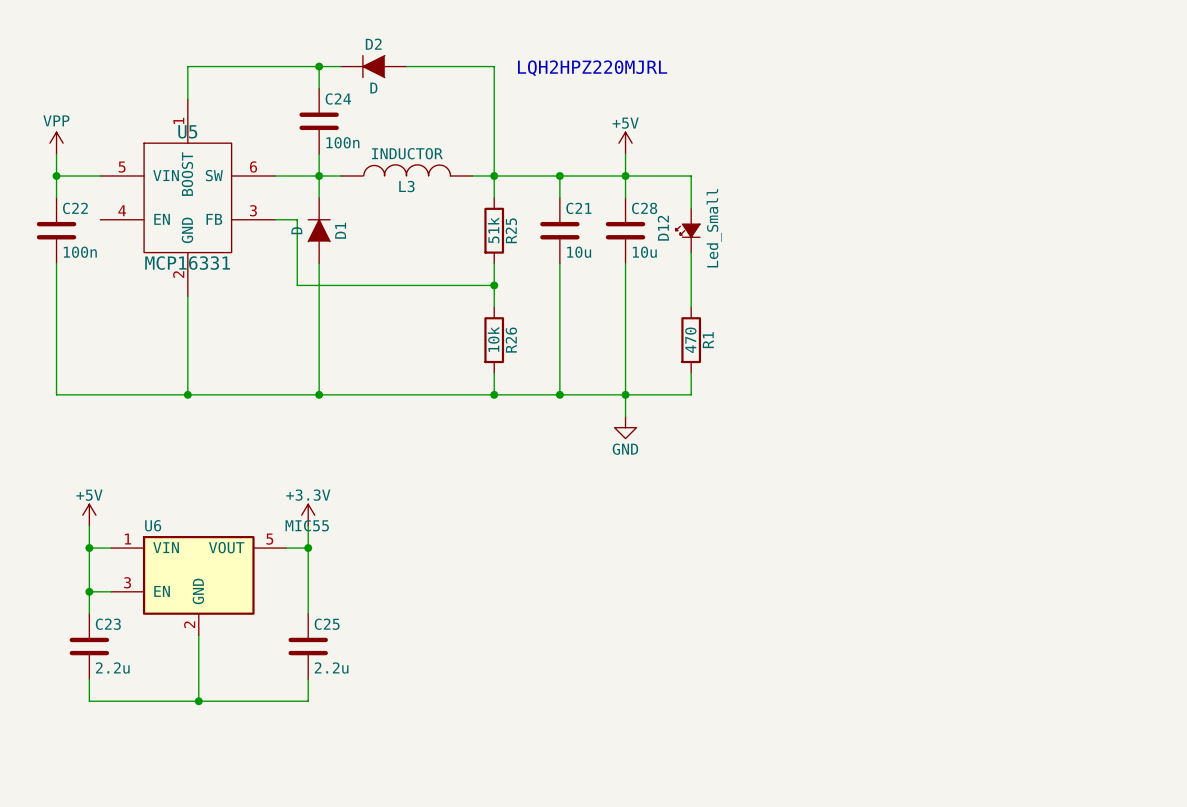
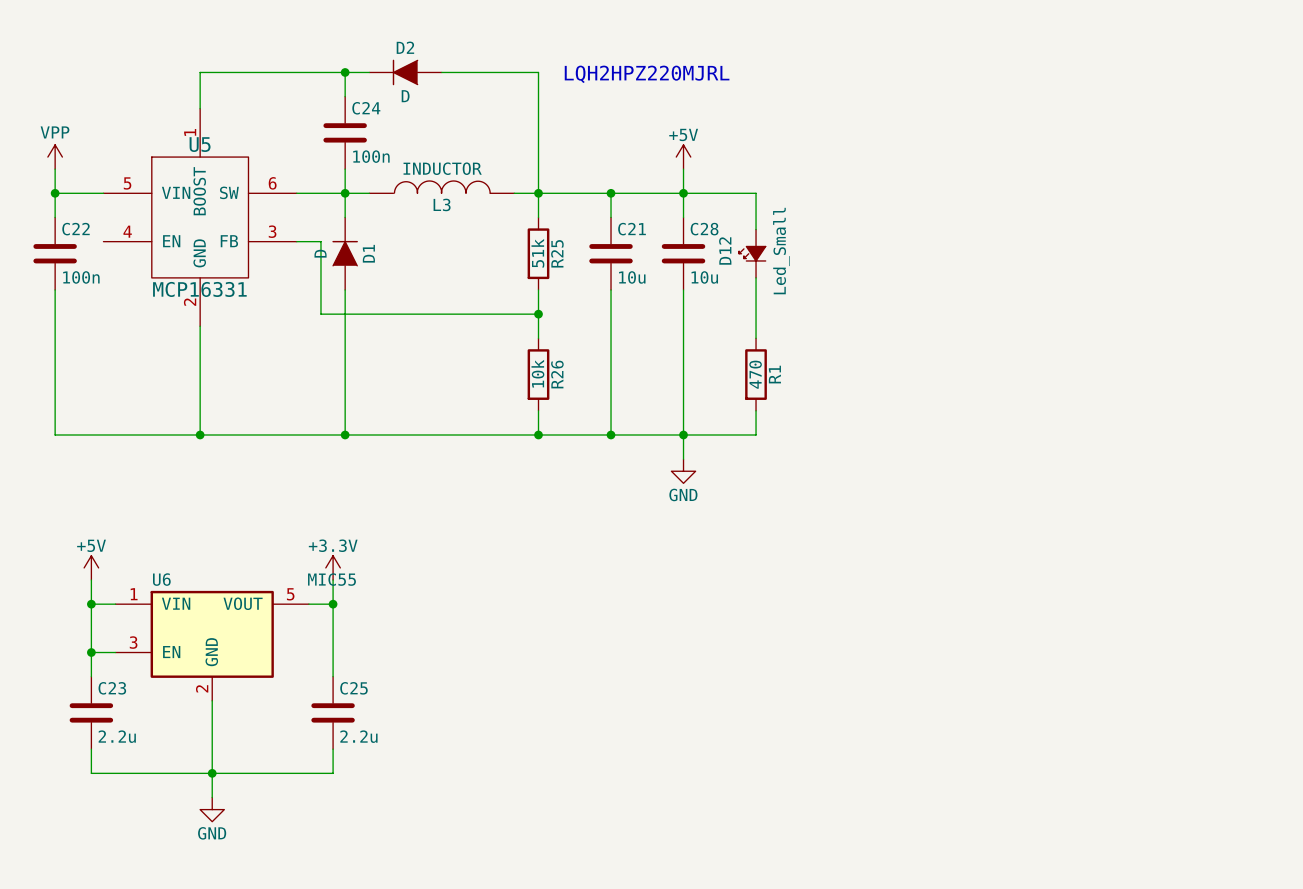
wire: none -> (212, 773) (212, 797)
power symbol: none -> GND (212, 809)

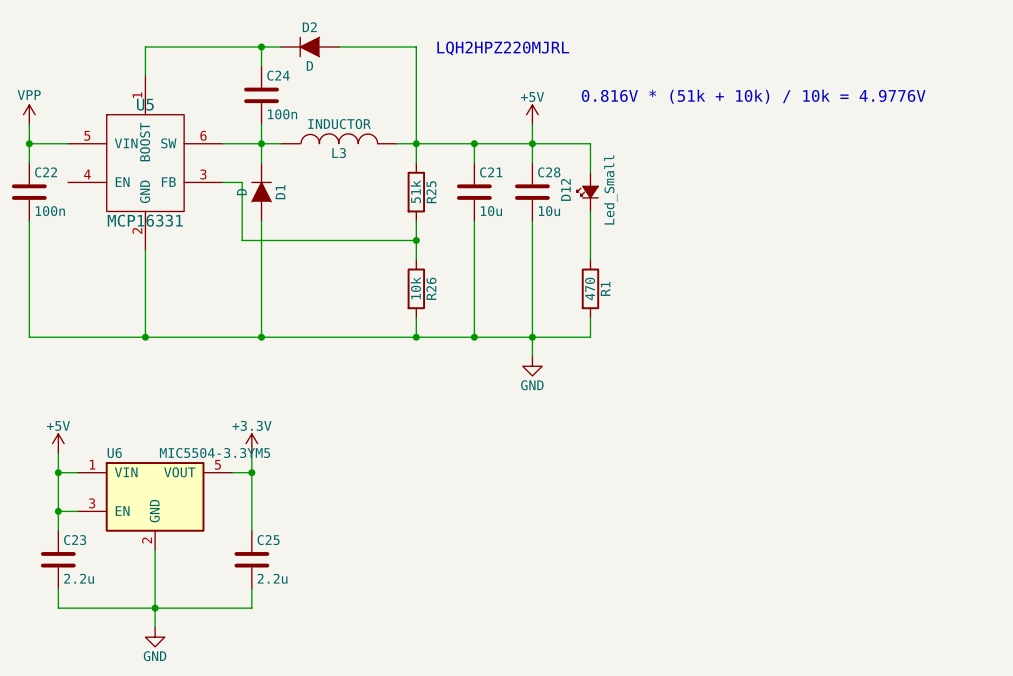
text: none -> 0.816V * (51k + 10k) / 10k = 4.9776V (753, 96)
U6 value: MIC55 (331, 579) -> MIC5504-3.3YM5 (215, 452)

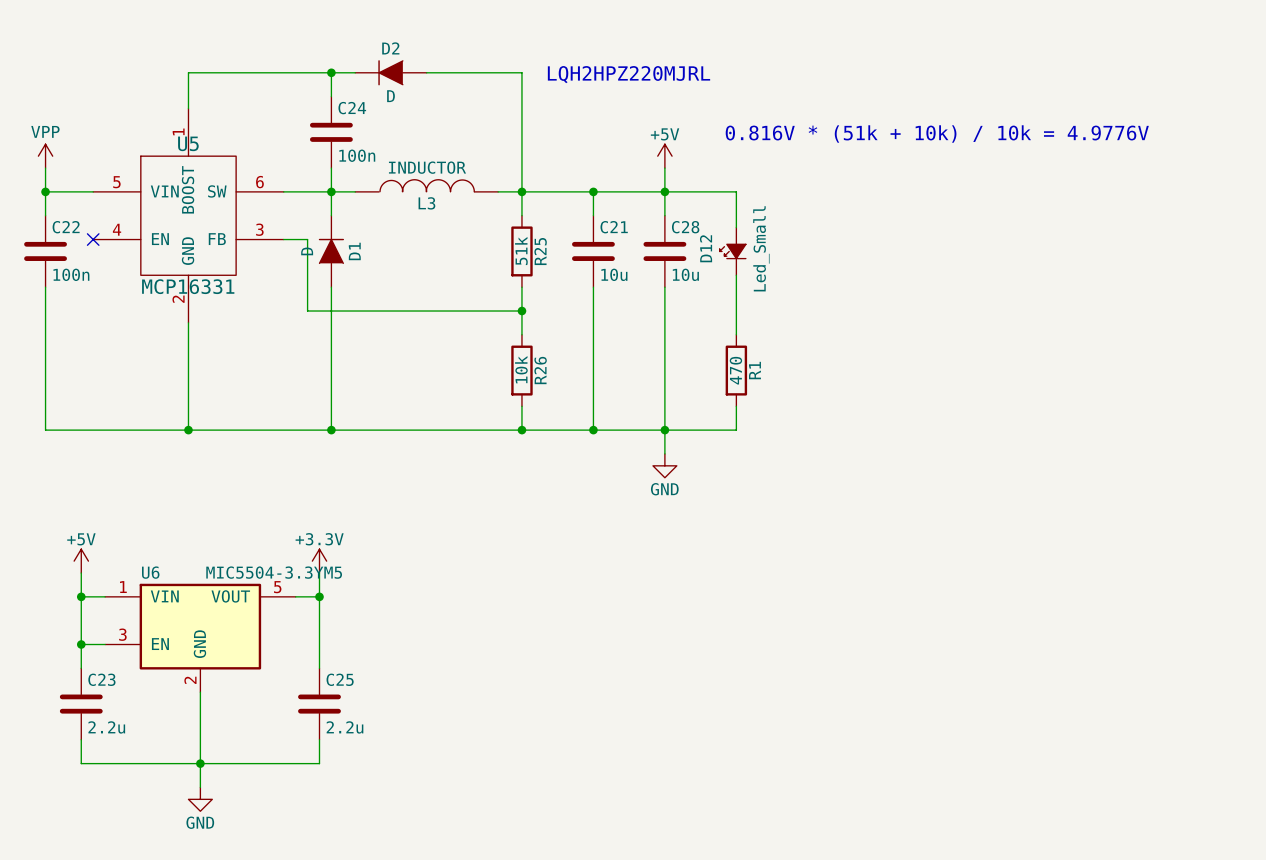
no-connect mark: none -> (93, 239)

